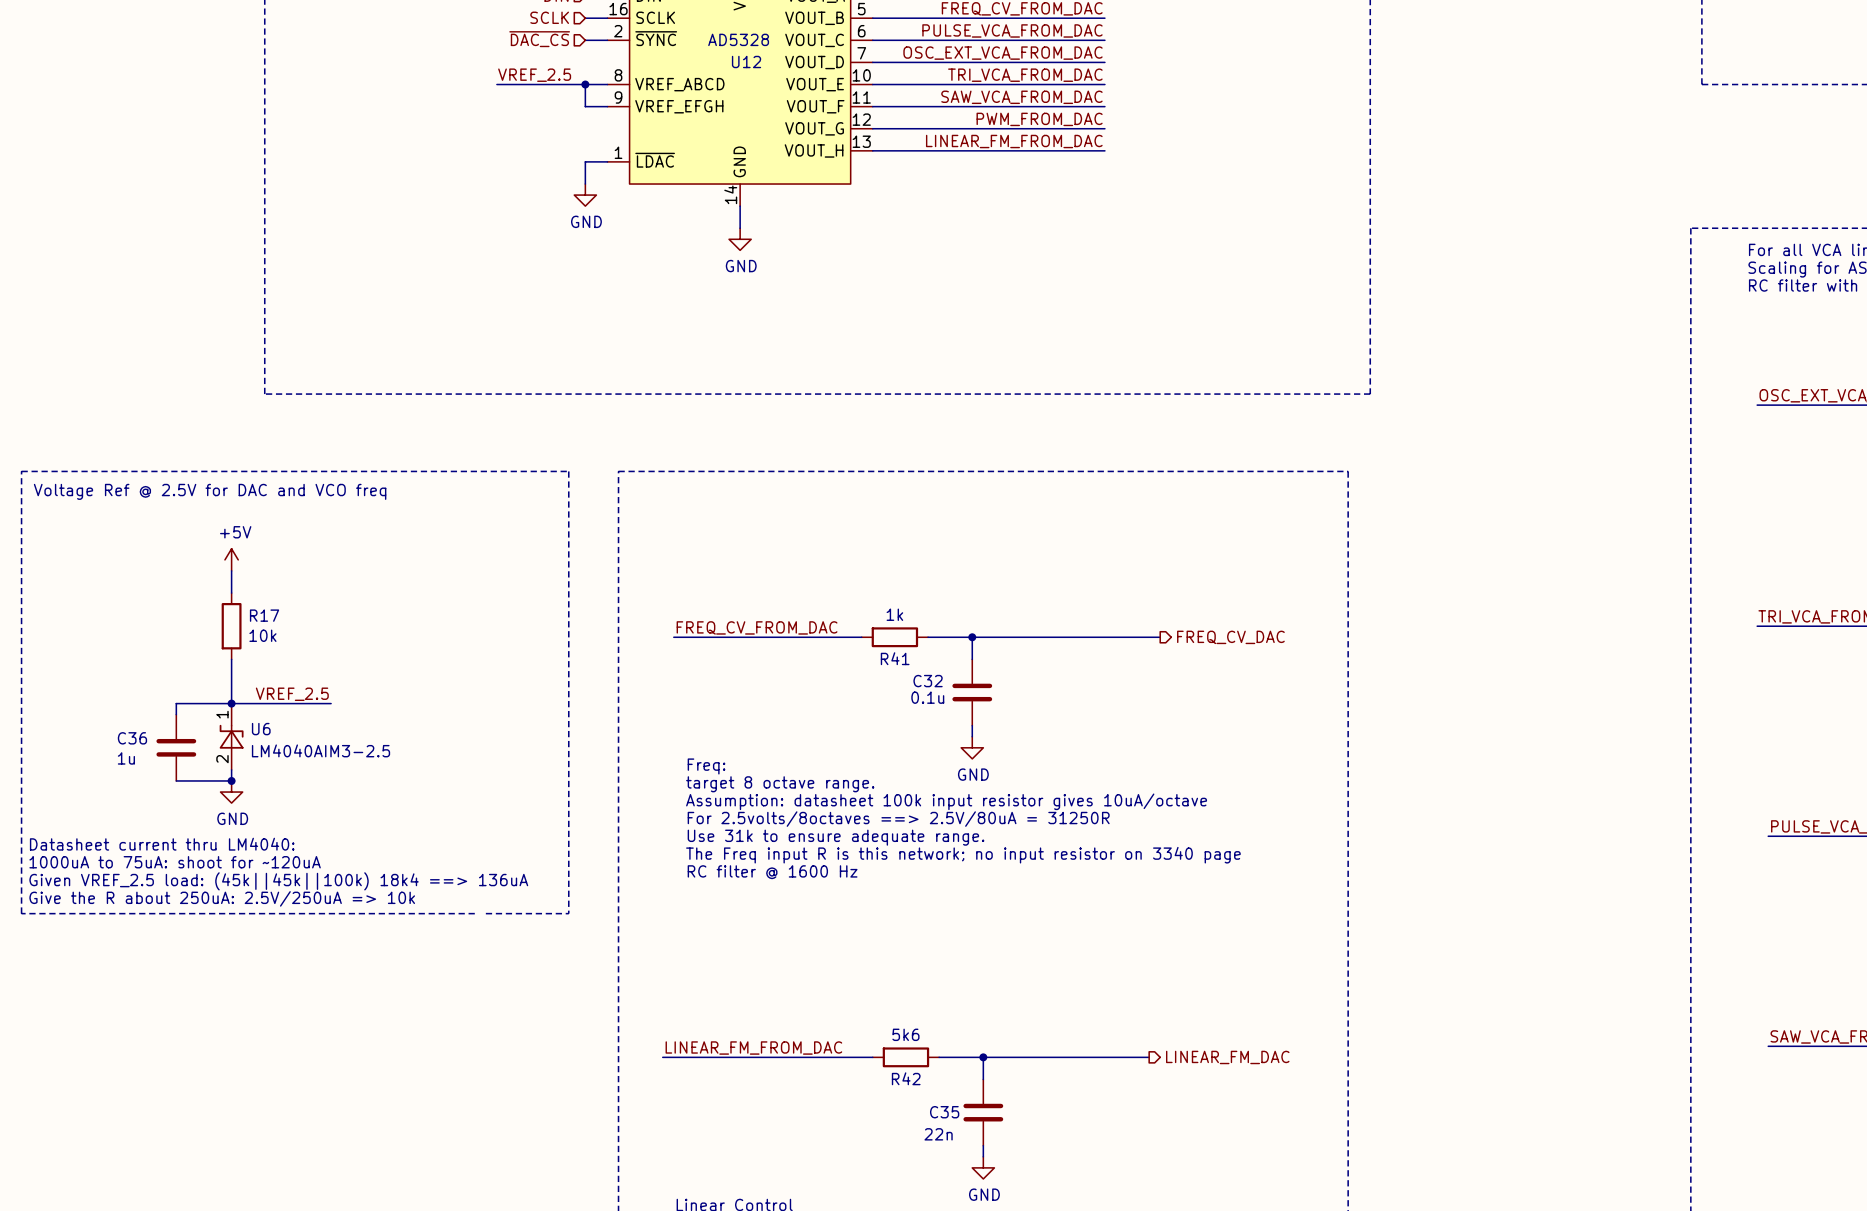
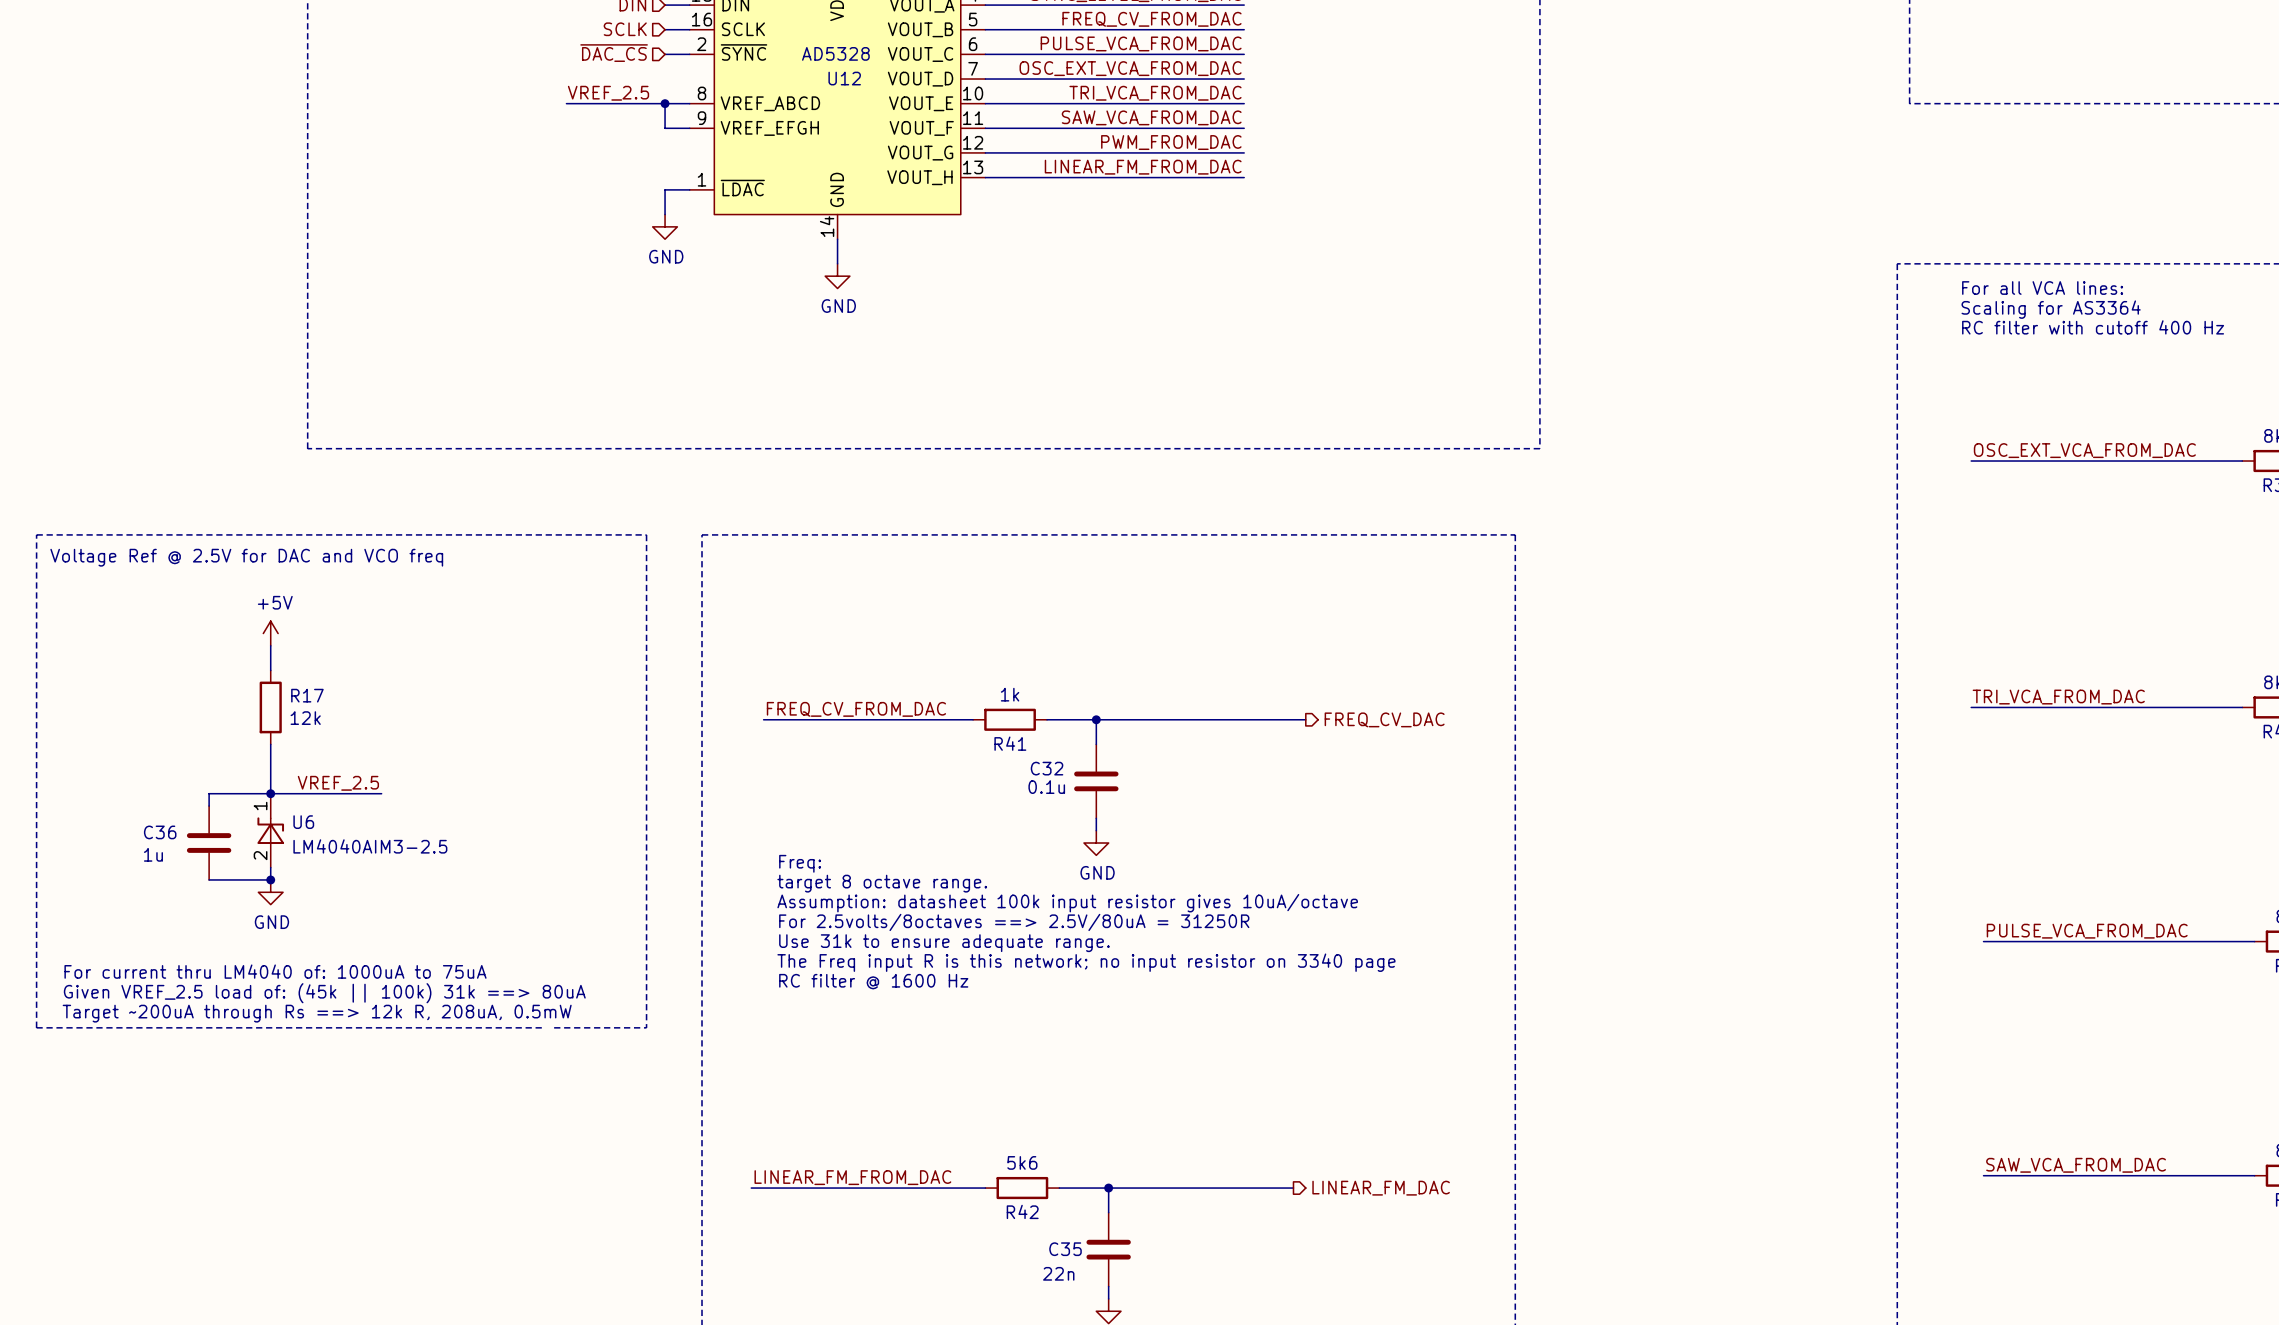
R17 value: 10k (262, 635) -> 12k (305, 718)
text: Datasheet current thru LM4040: (162, 844) -> none
text: 1000uA to 75uA: shoot for ~120uA (175, 862) -> none
text: none -> For current thru LM4040 of: 1000uA to 75uA (275, 971)
text: Given VREF_2.5 load: (45k||45k||100k) 18k4 ==> 136uA (278, 881) -> Given VREF_2.5 load of: (45k || 100k) 31k ==> 80uA (324, 993)
text: Give the R about 250uA: 2.5V/250uA => 10k (222, 898) -> none
text: none -> Target ~200uA through Rs ==> 12k R, 208uA, 0.5mW (317, 1013)

